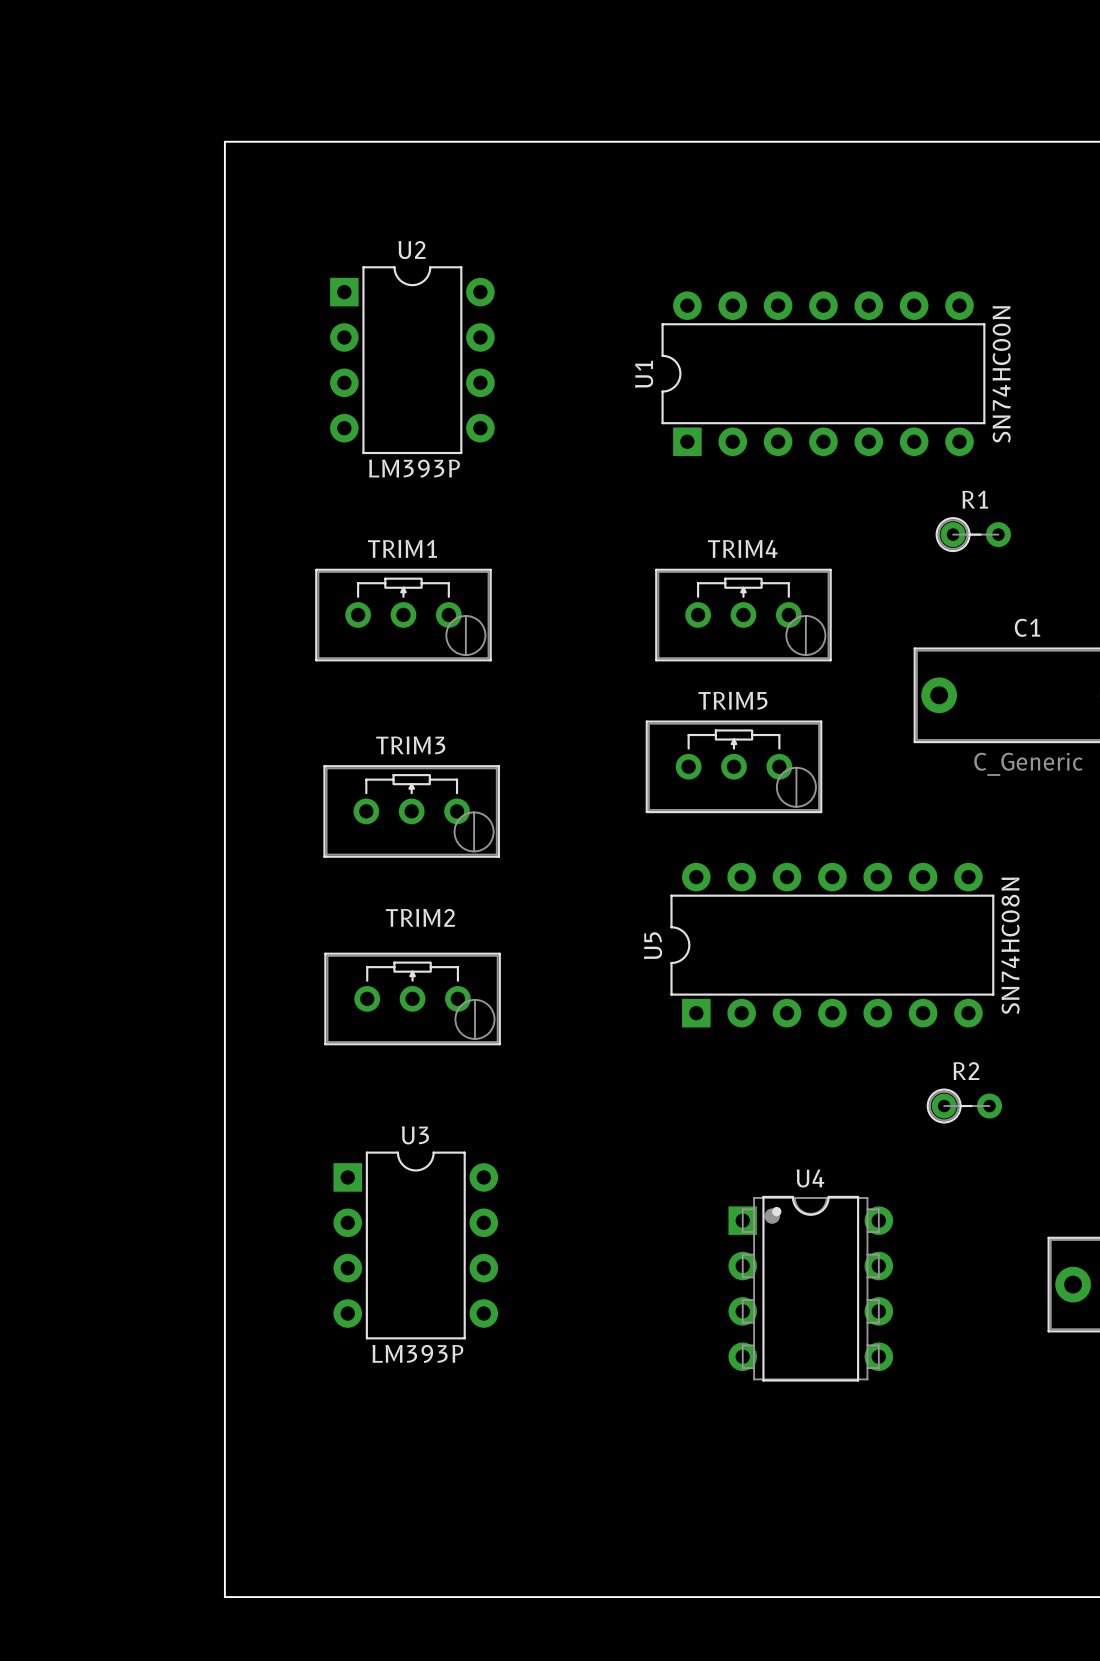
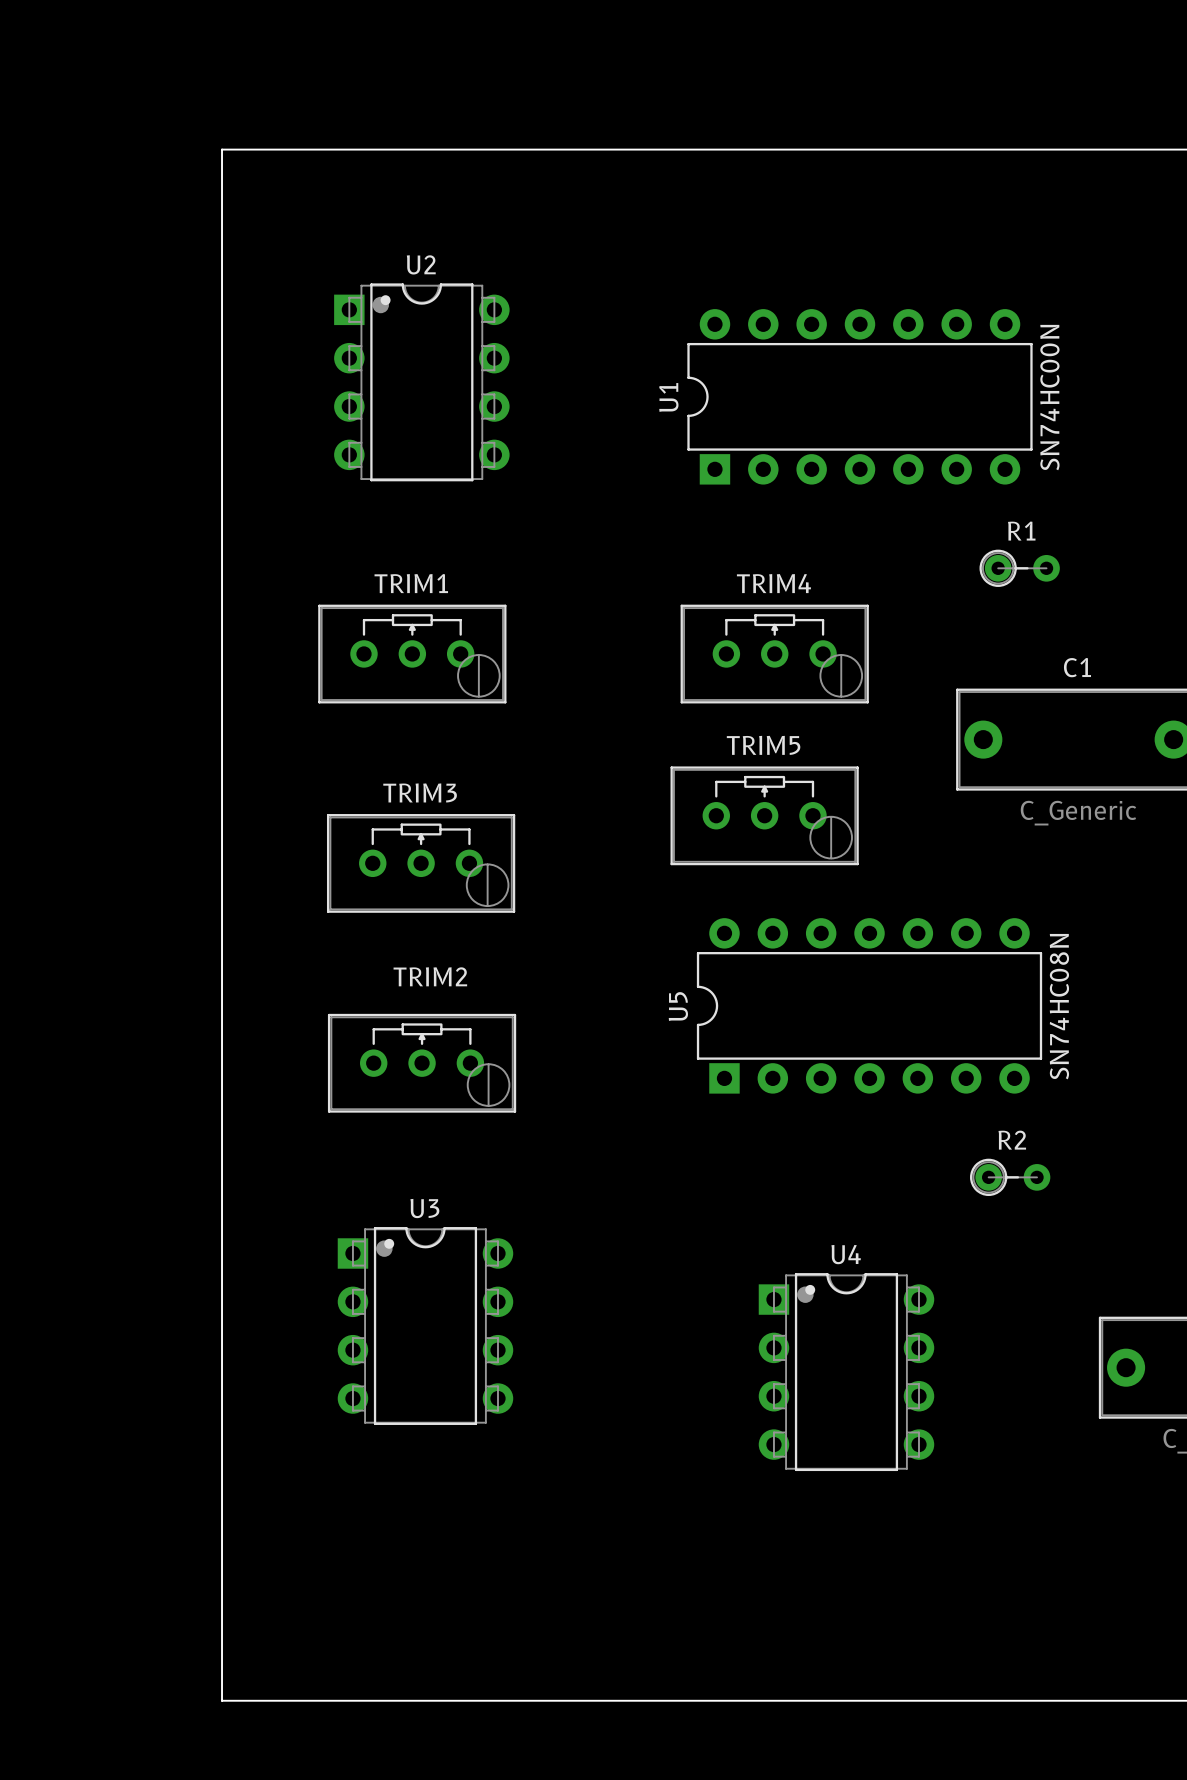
U2 footprint: [330, 266, 495, 455] -> [334, 283, 510, 482]
U2 value: LM393P (414, 468) -> none
U3 footprint: [333, 1151, 499, 1340] -> [337, 1227, 514, 1425]
U3 value: LM393P (417, 1353) -> none

